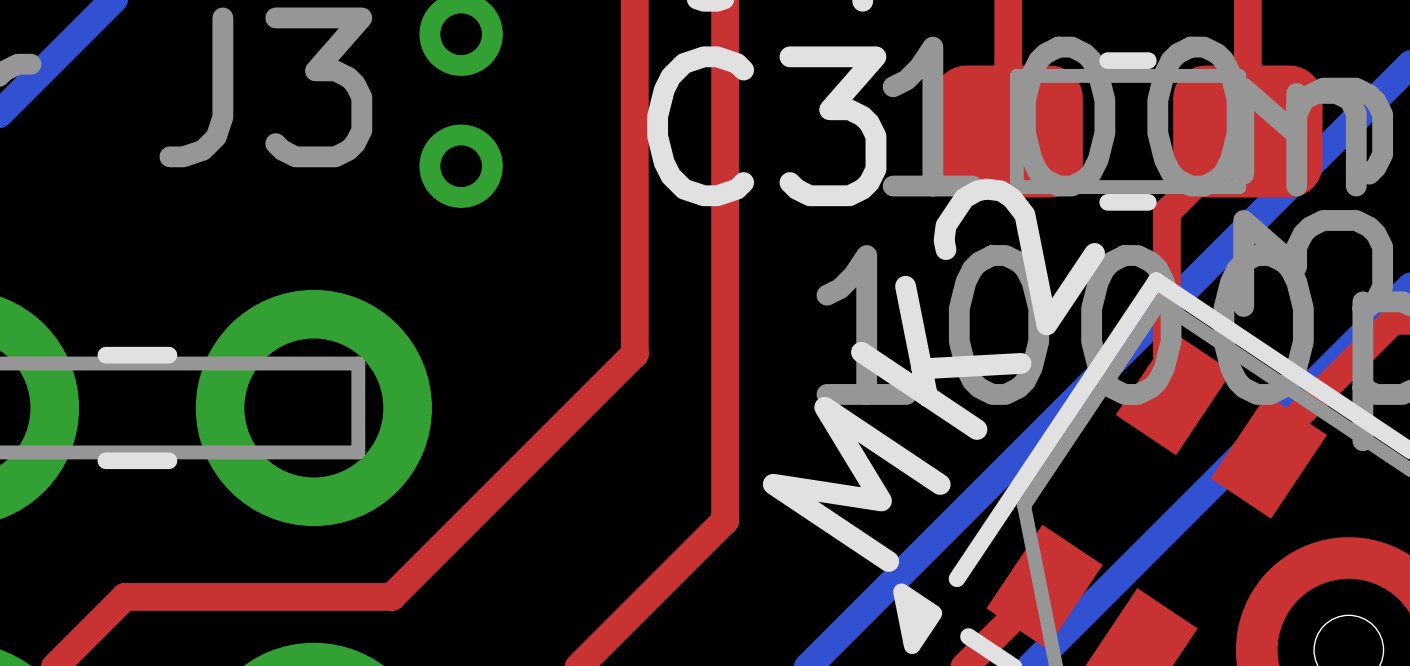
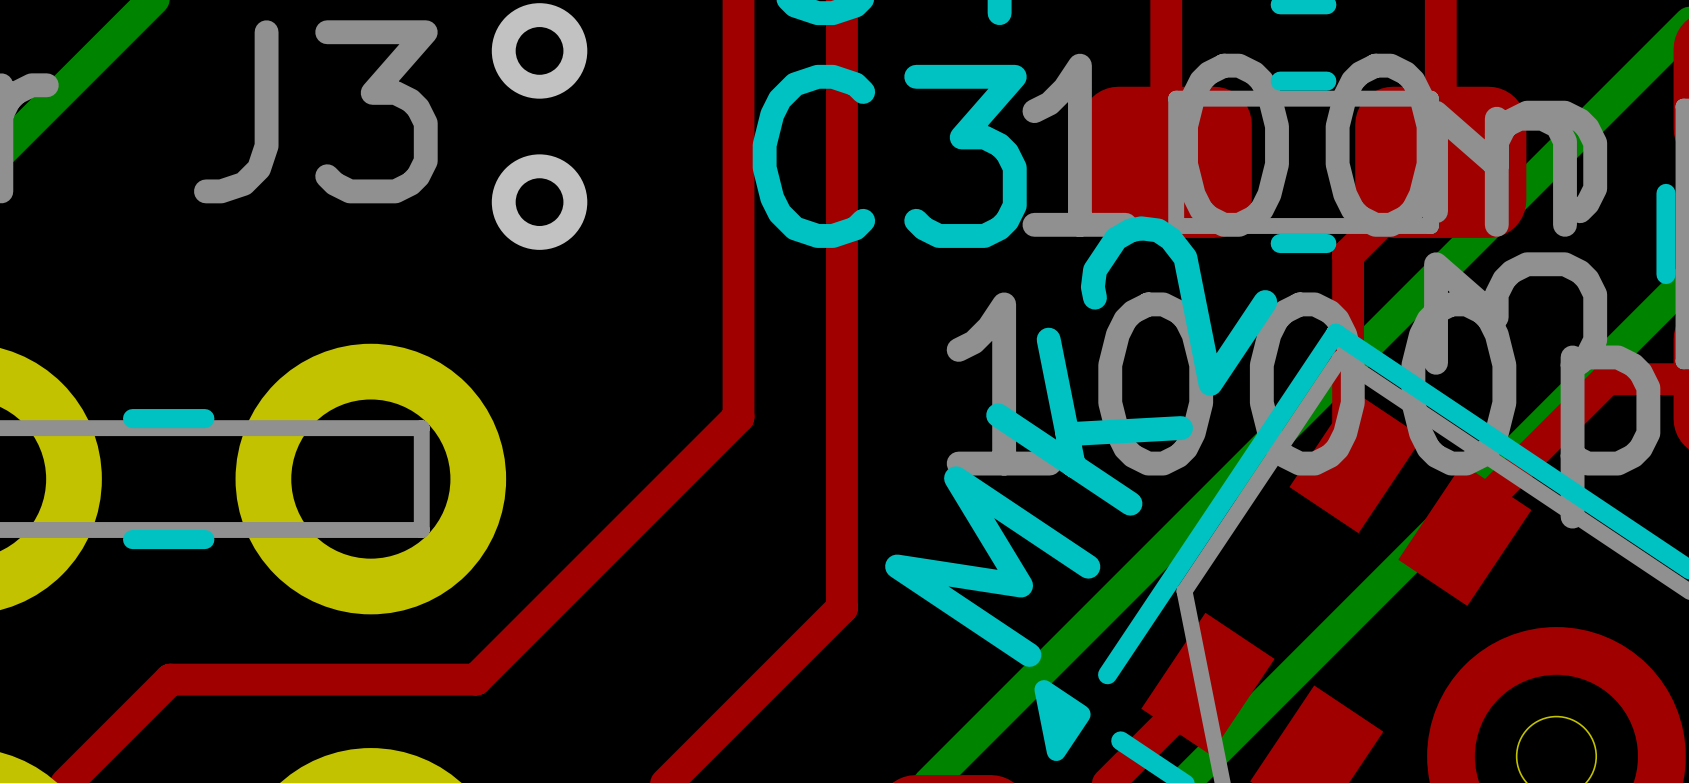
top track: (405, 583) (391, 596) (124, 596) -> (475, 679) (170, 679) (154, 695)

